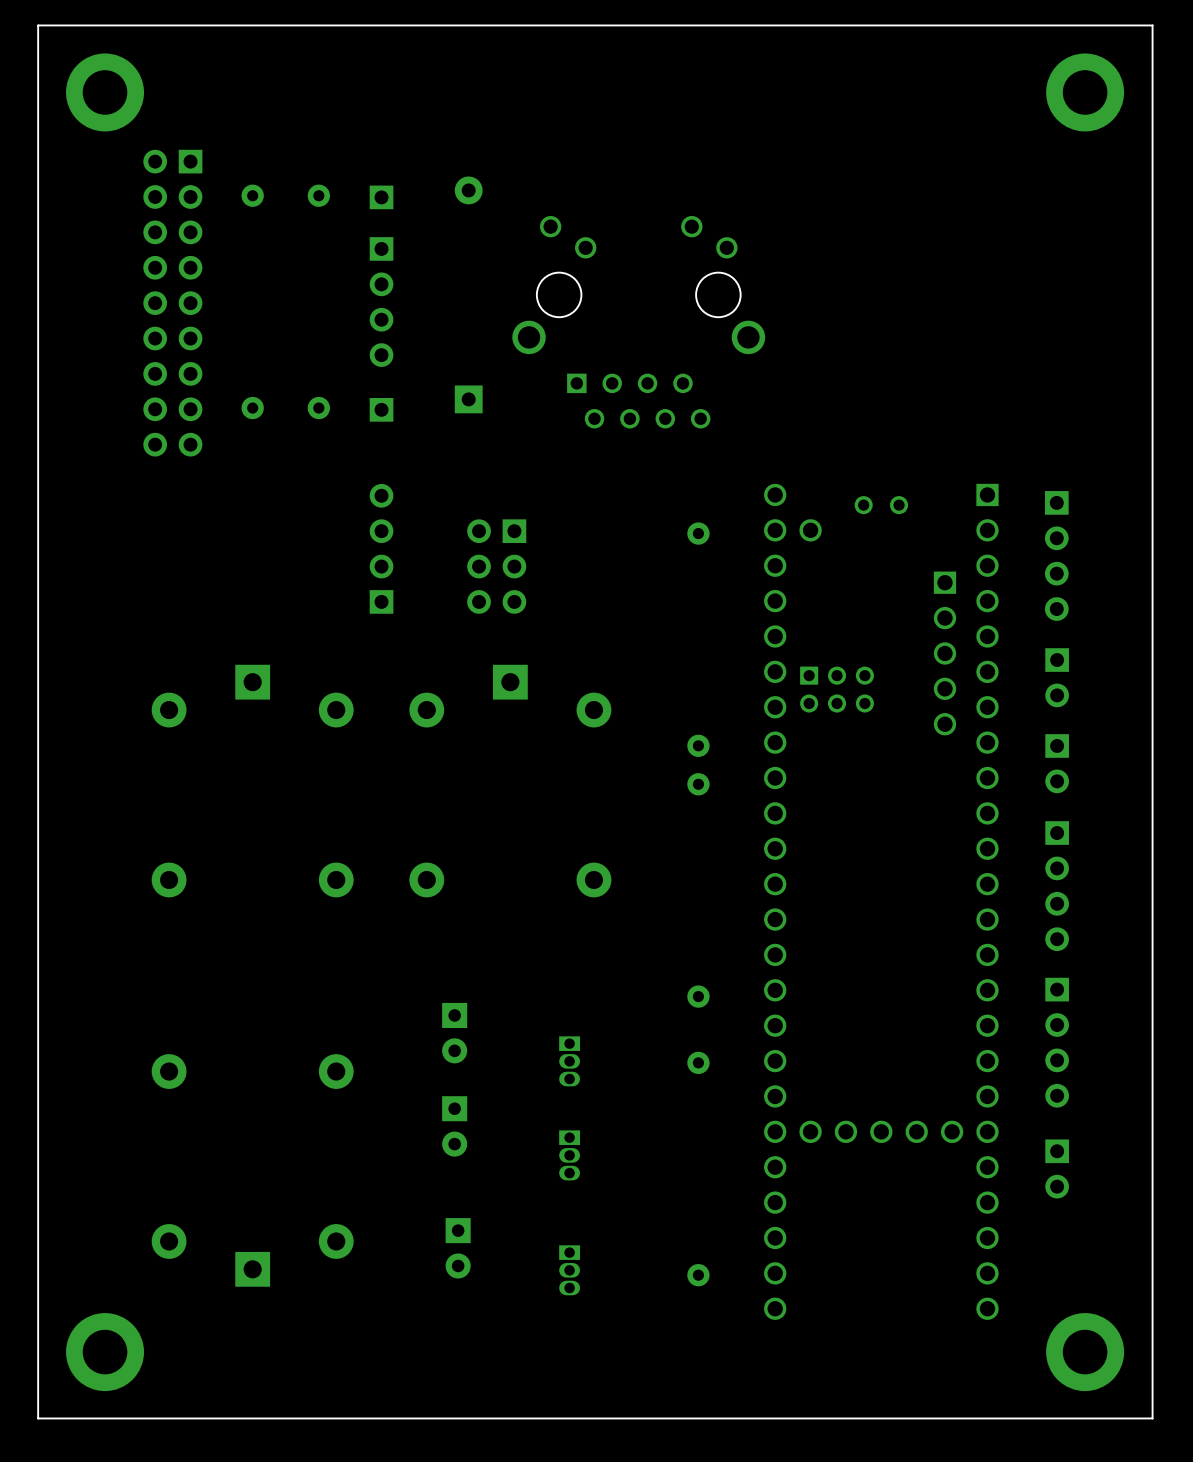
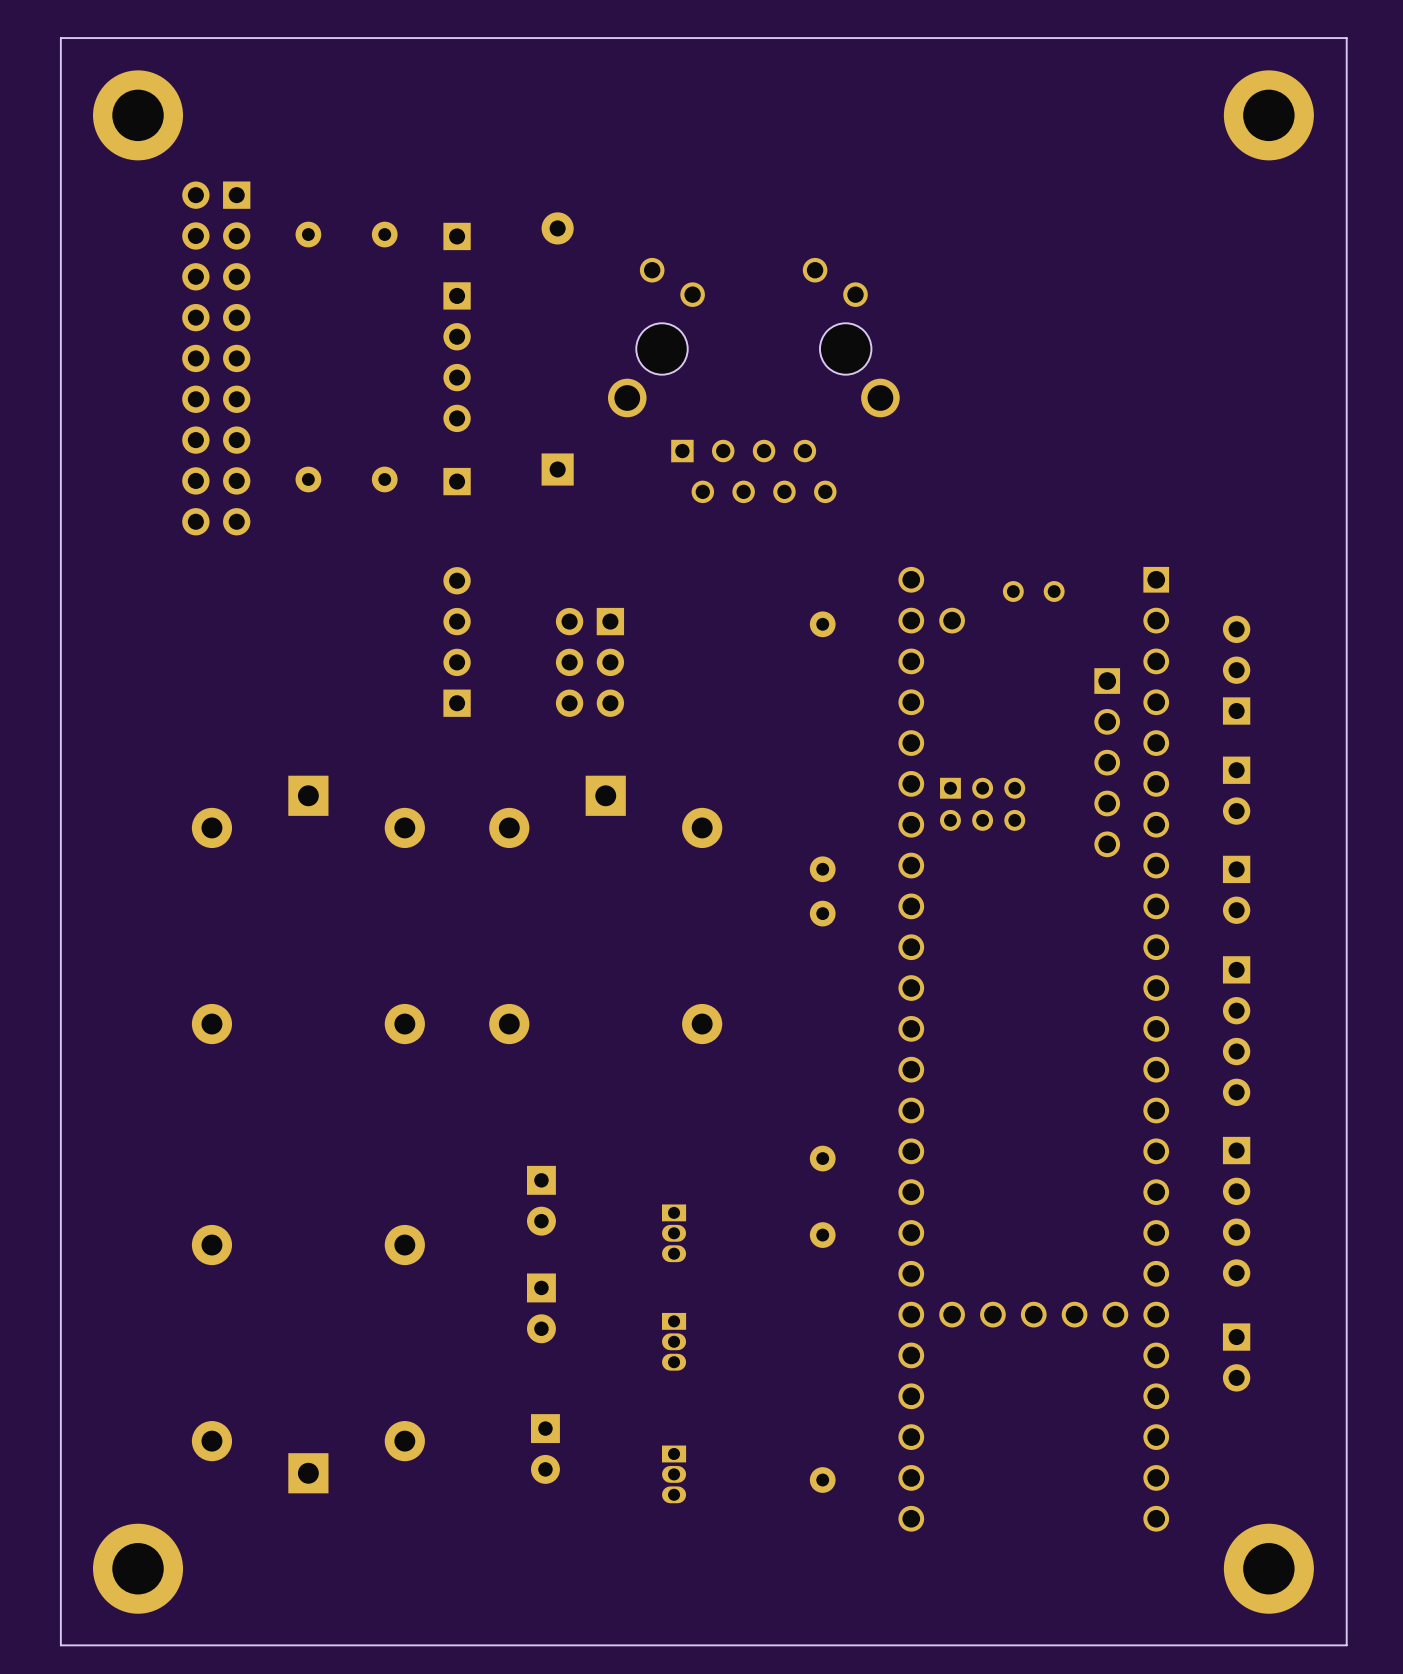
part: (1056, 555) -> none
part: none -> (1236, 670)

